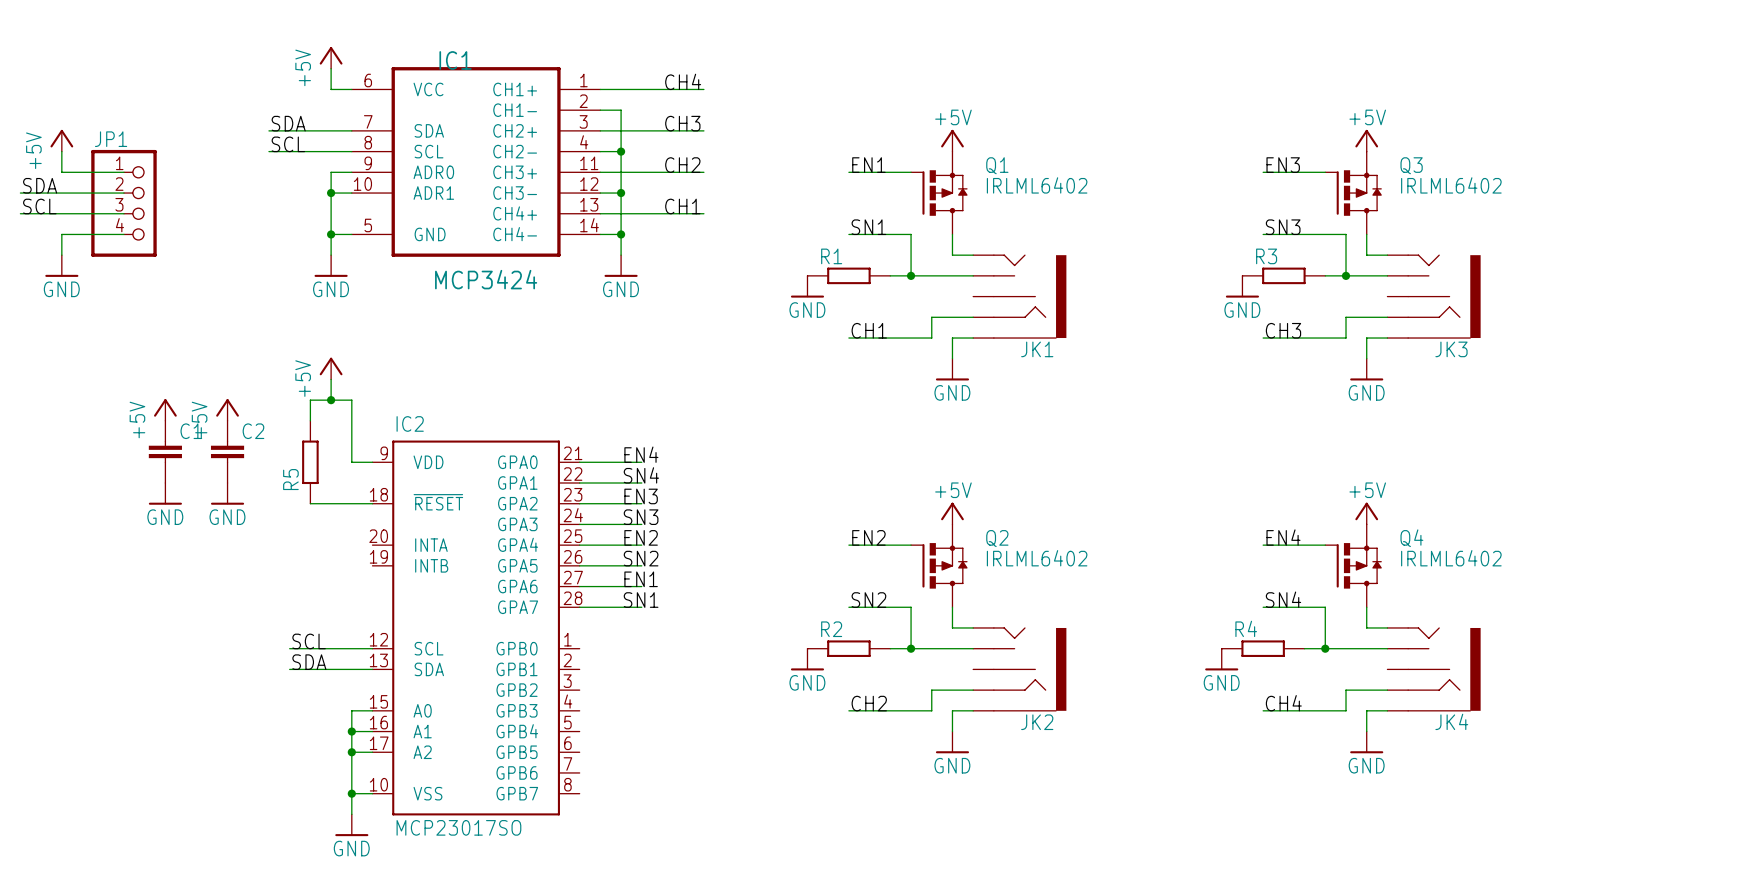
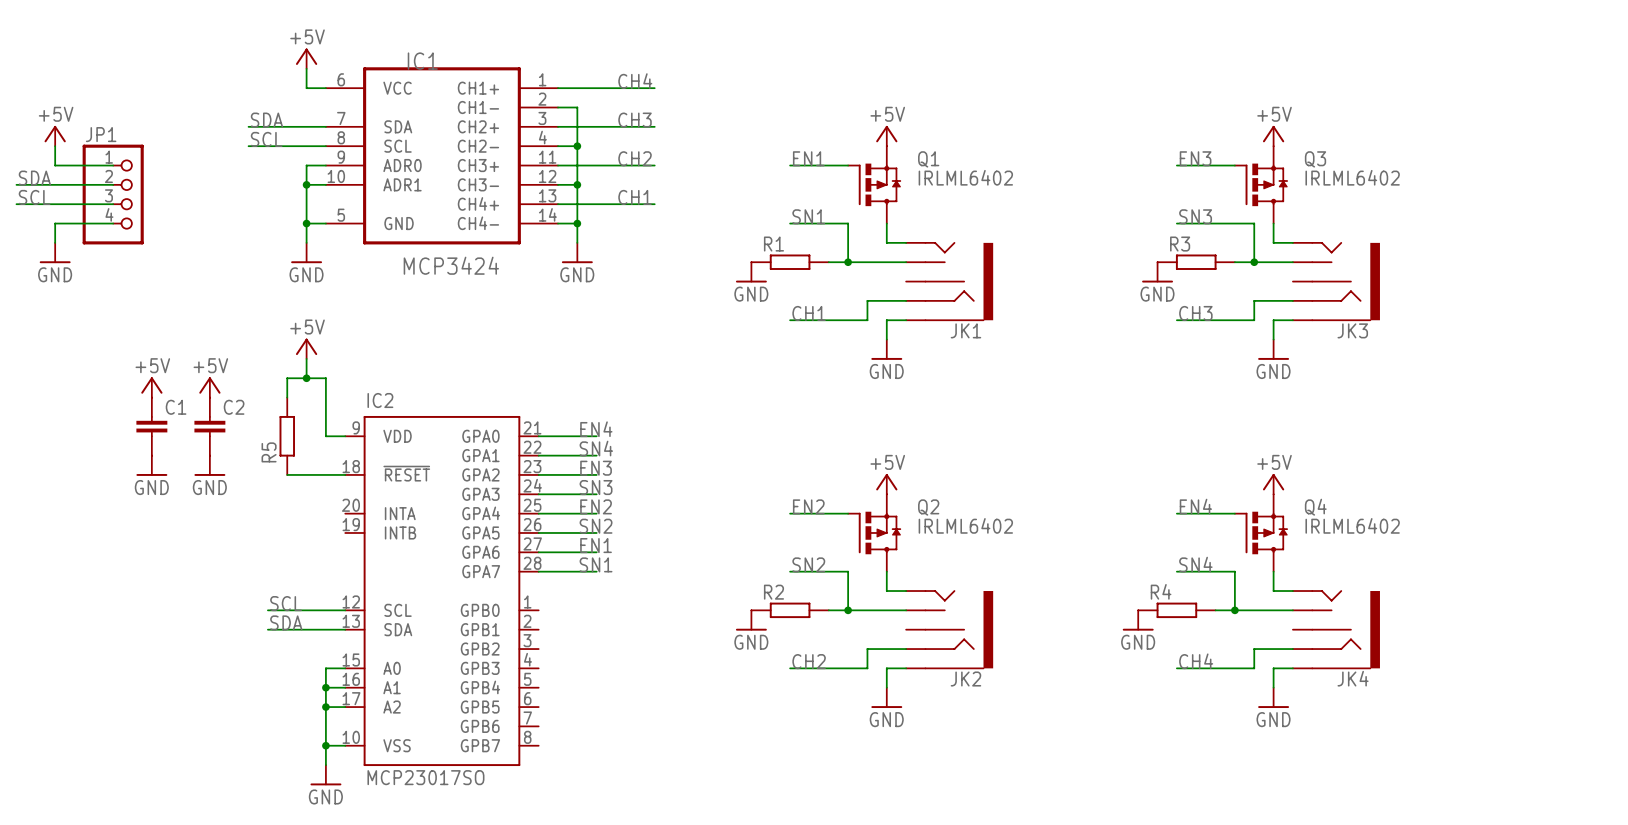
power symbol text rotation: 0° (303, 67) -> 90° clockwise (307, 36)
power symbol text rotation: 0° (33, 150) -> 90° clockwise (56, 114)
power symbol text rotation: 0° (303, 378) -> 90° clockwise (307, 327)
power symbol text rotation: 0° (137, 419) -> 90° clockwise (152, 365)
power symbol text rotation: 0° (199, 419) -> 90° clockwise (210, 365)

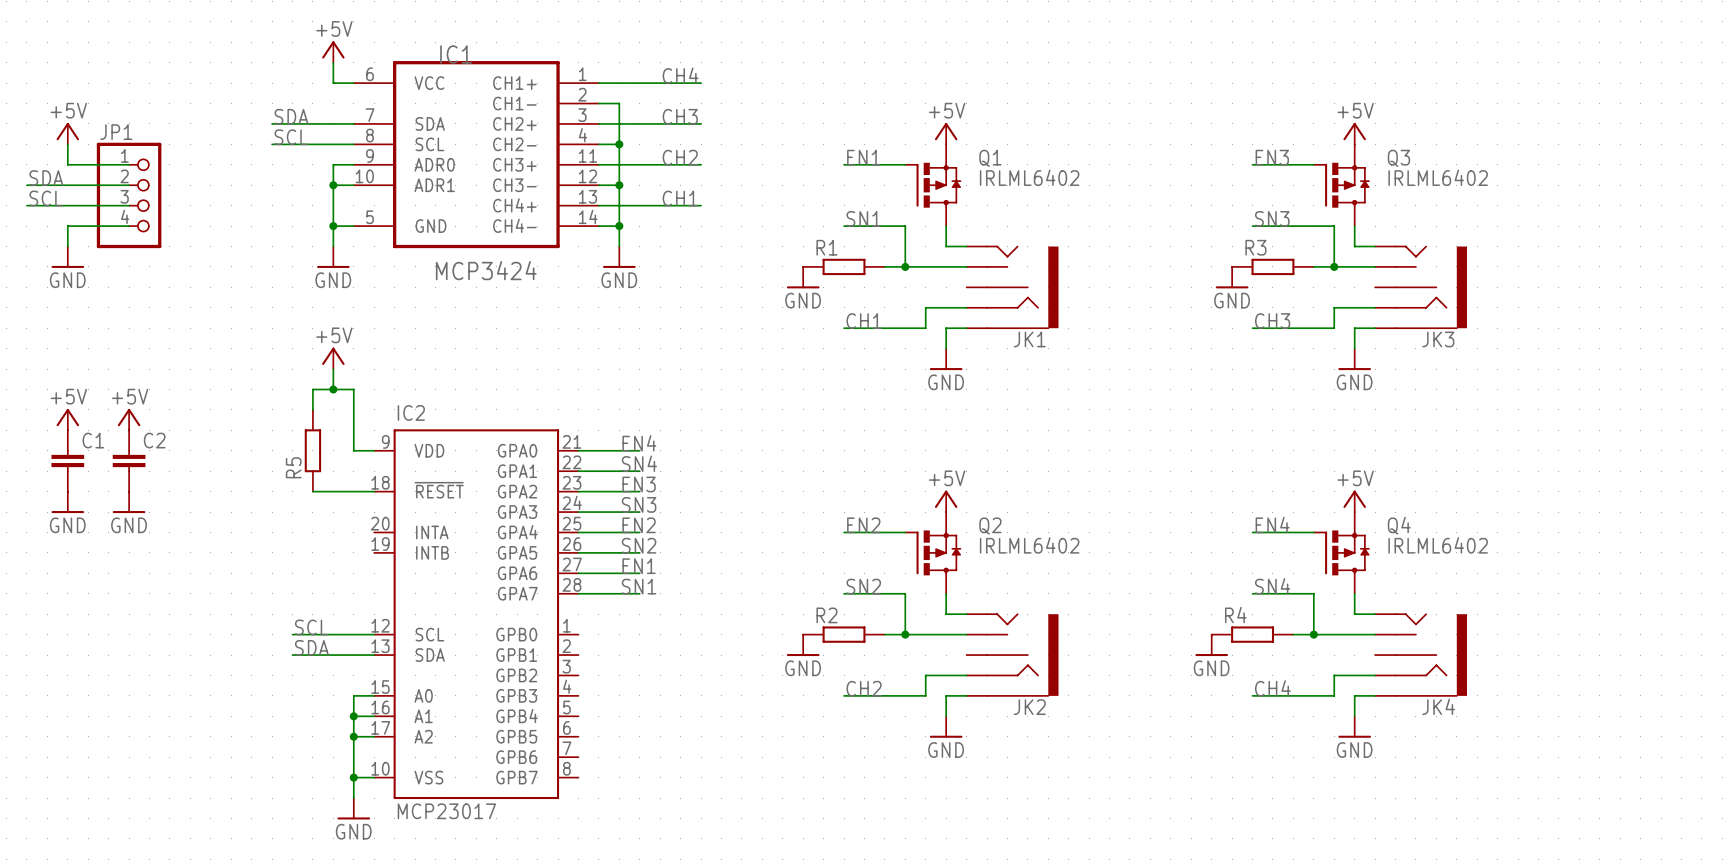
power symbol position: +5V (151, 387) -> +5V (129, 419)
power symbol: +5V (209, 387) -> none
power symbol: none -> +5V (67, 419)
C1 position: (151, 426) -> (67, 460)
C2 position: (209, 426) -> (129, 460)
power symbol position: GND (151, 465) -> GND (129, 502)
power symbol: GND (209, 465) -> none
power symbol: none -> GND (67, 502)
IC2 value: MCP23017SO (425, 777) -> MCP23017 (446, 811)

